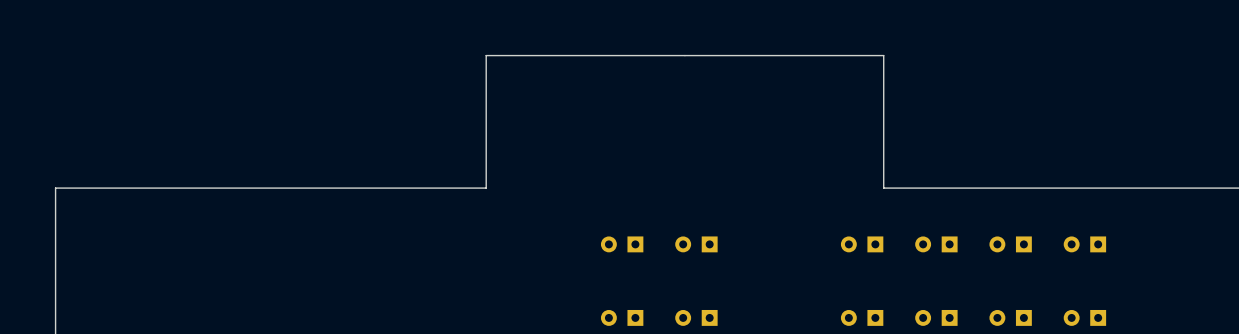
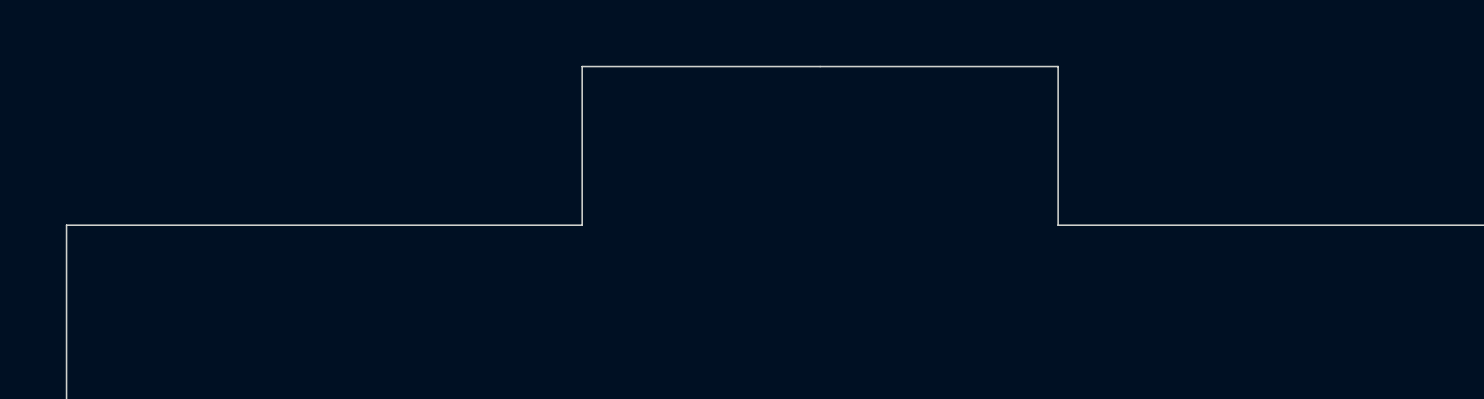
part: (622, 244) -> none
part: (696, 244) -> none
part: (862, 244) -> none
part: (936, 244) -> none
part: (1010, 244) -> none
part: (1084, 244) -> none
part: (622, 317) -> none
part: (696, 317) -> none
part: (862, 317) -> none
part: (936, 317) -> none
part: (1010, 317) -> none
part: (1084, 317) -> none

